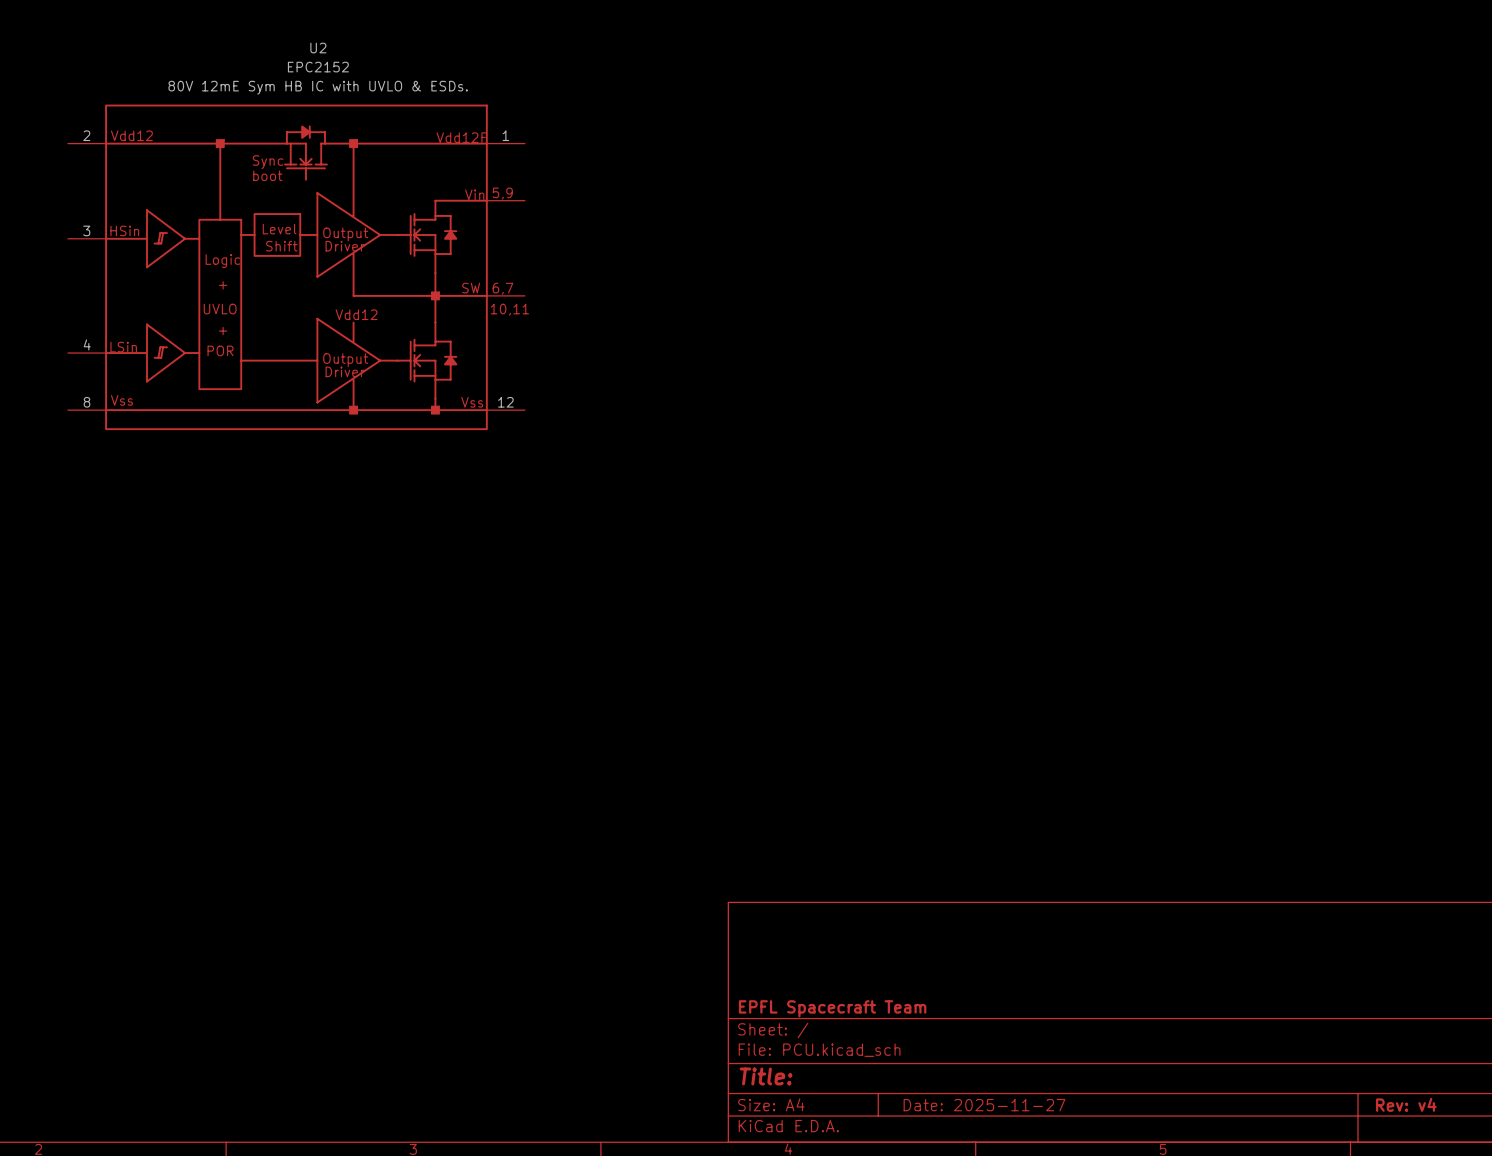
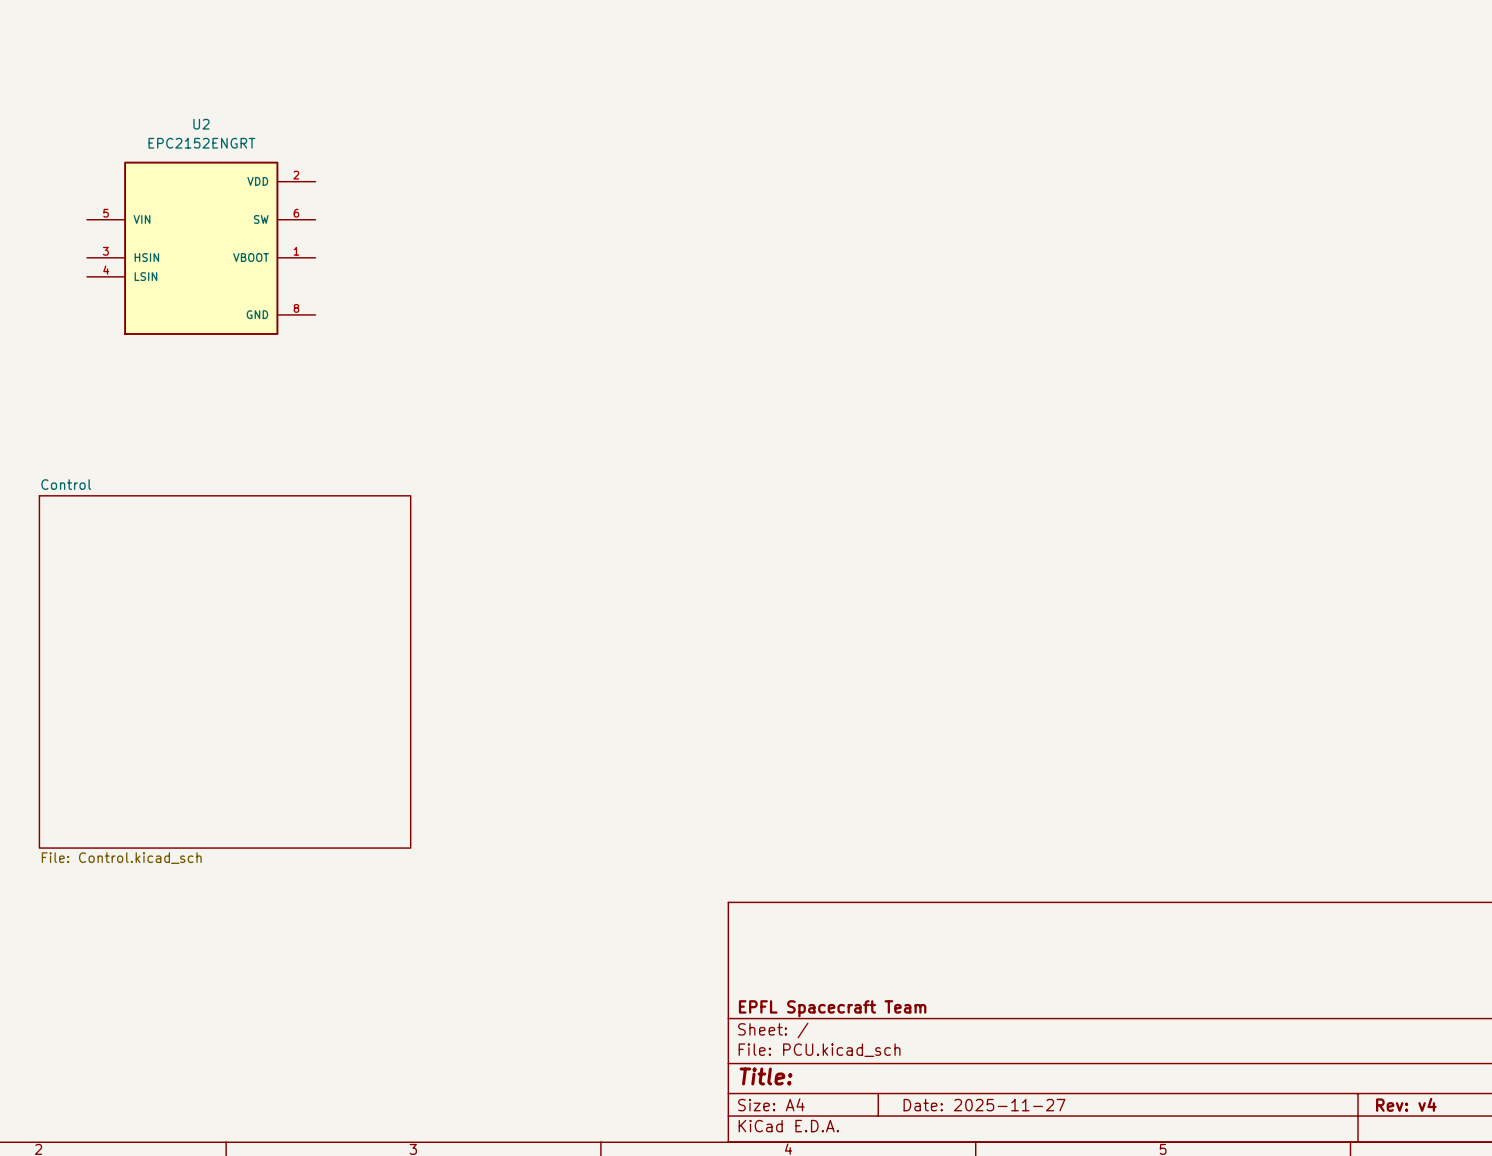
U2 name position: U2 (318, 48) -> U2 (201, 124)
U2 value: EPC2152 (318, 67) -> EPC2152ENGRT (201, 143)
U2 text: 80V 12mE Sym HB IC with UVLO & ESDs. (318, 87) -> none
U2 symbol: [67, 104, 525, 431] -> [87, 161, 316, 335]
sheet Control: none -> File: Control.kicad_sch (225, 671)

